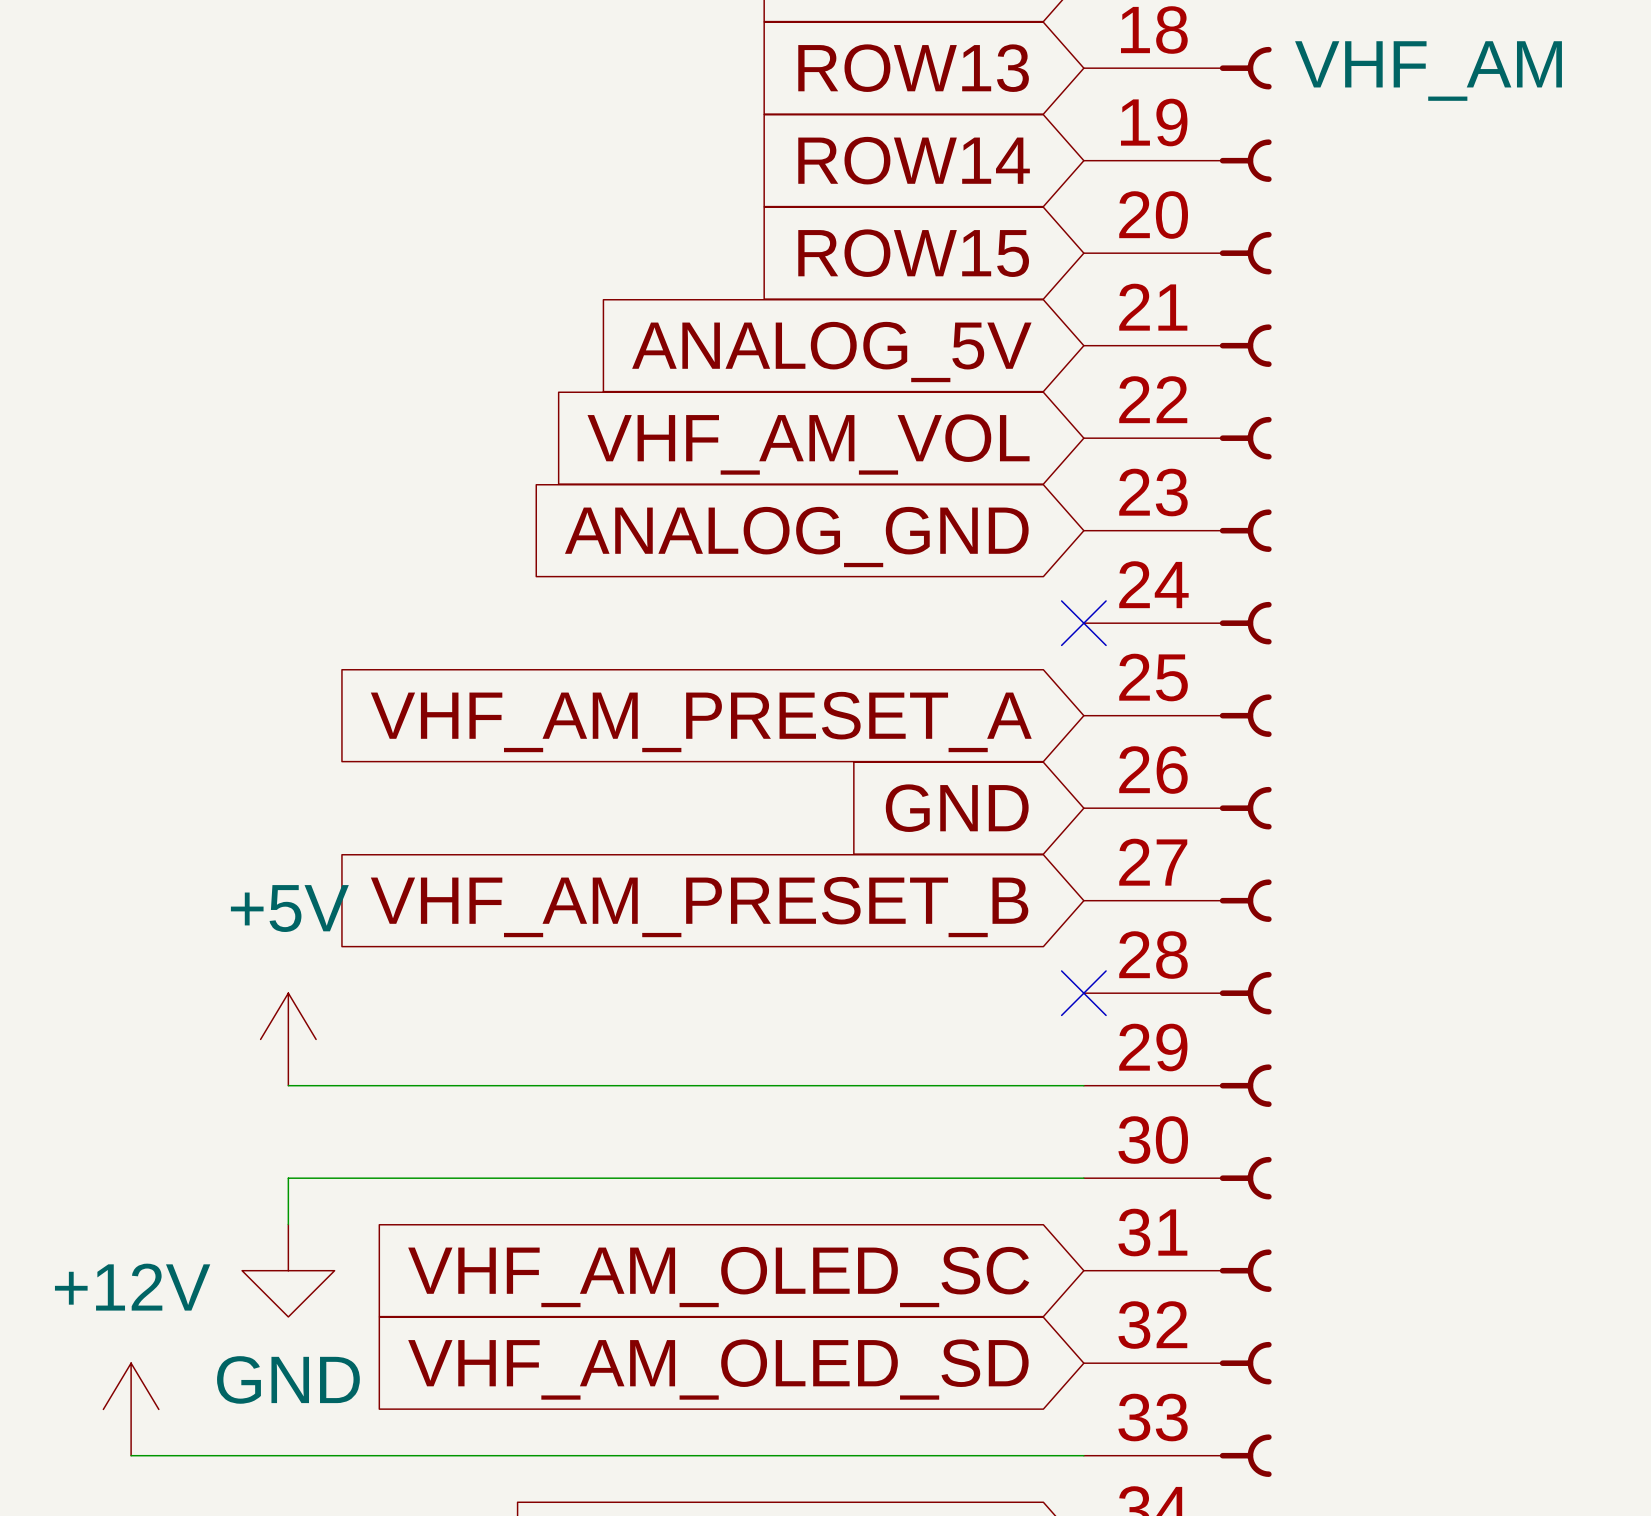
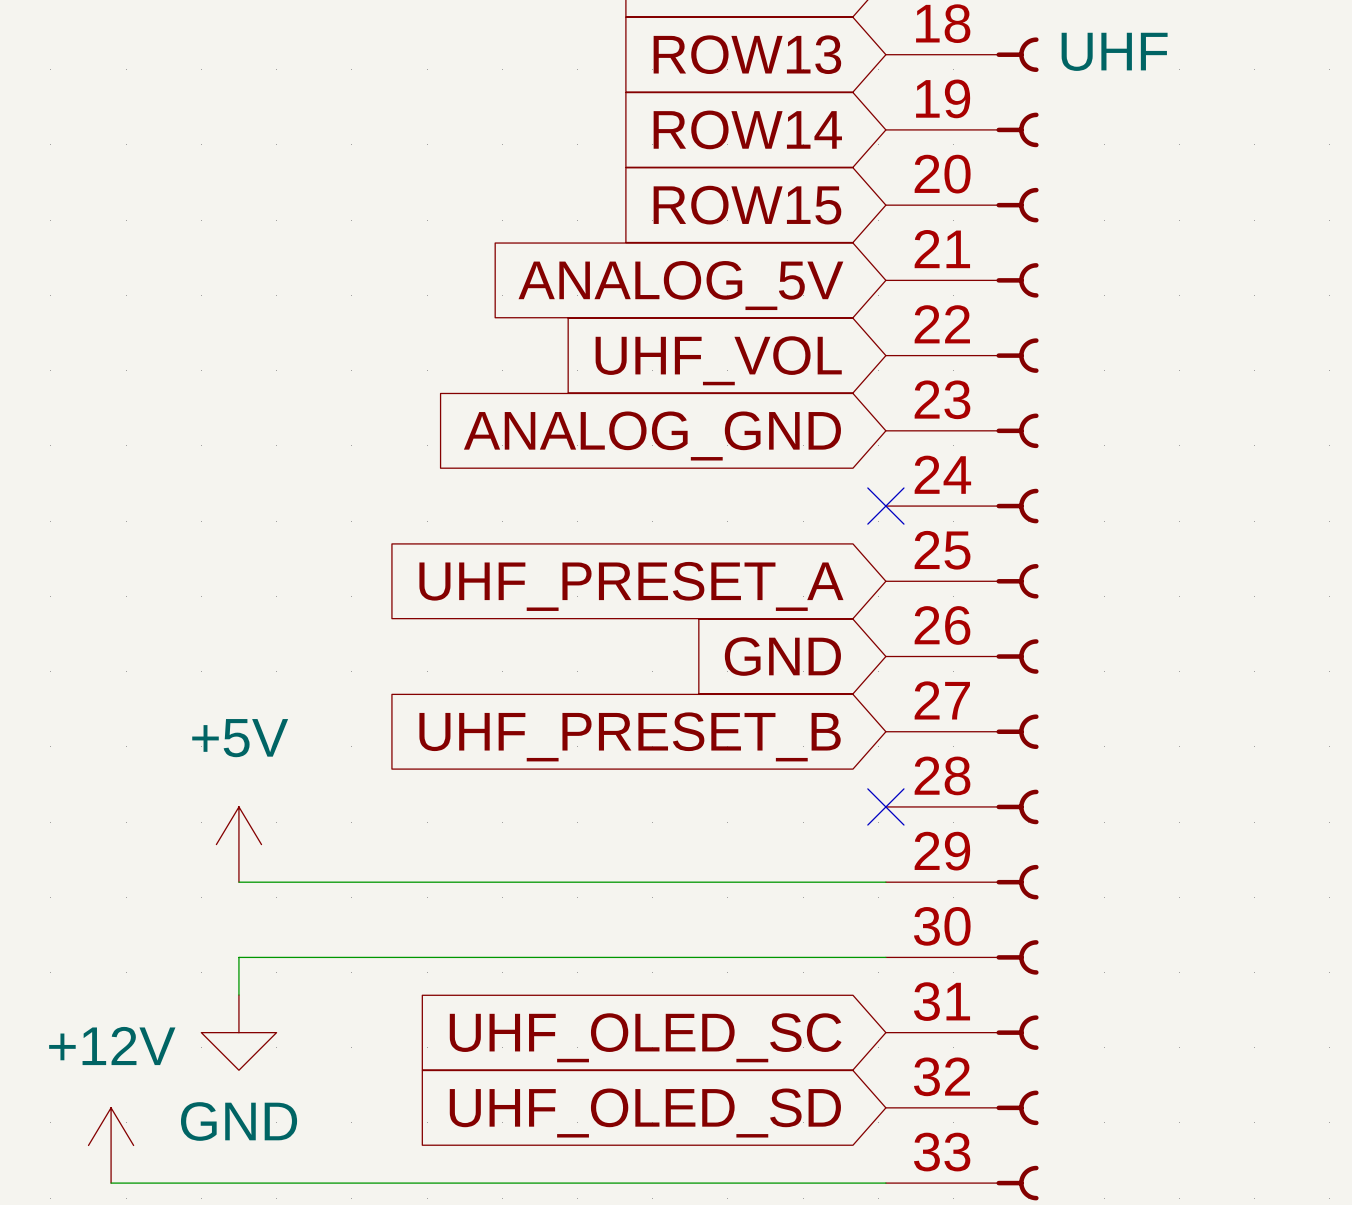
part value: VHF_AM (1428, 71) -> UHF (1114, 51)
global label: VHF_AM_VOL (808, 444) -> UHF_VOL (718, 360)
global label: VHF_AM_PRESET_A (701, 722) -> UHF_PRESET_A (631, 586)
global label: VHF_AM_PRESET_B (699, 907) -> UHF_PRESET_B (630, 736)
global label: VHF_AM_OLED_SC (718, 1277) -> UHF_OLED_SC (645, 1037)
global label: VHF_AM_OLED_SD (718, 1369) -> UHF_OLED_SD (645, 1113)

